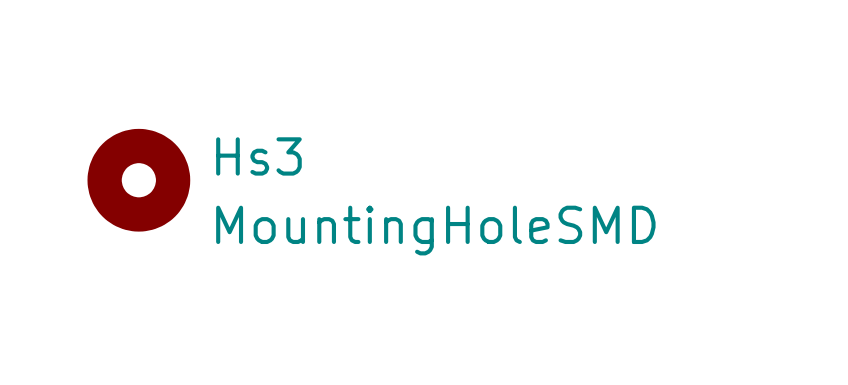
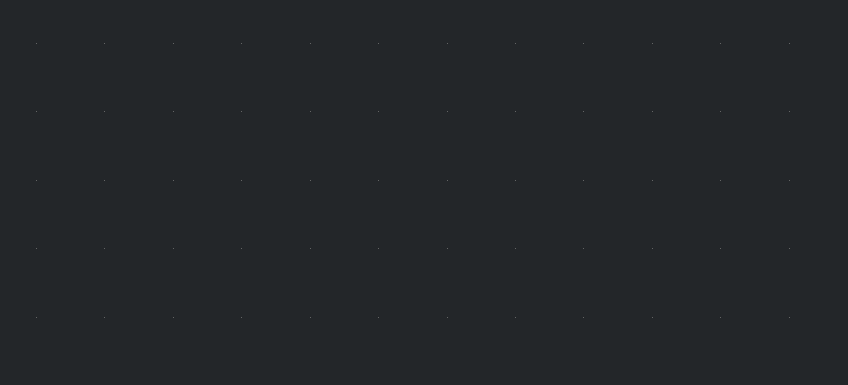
Hs3: MountingHoleSMD (138, 180) -> none

